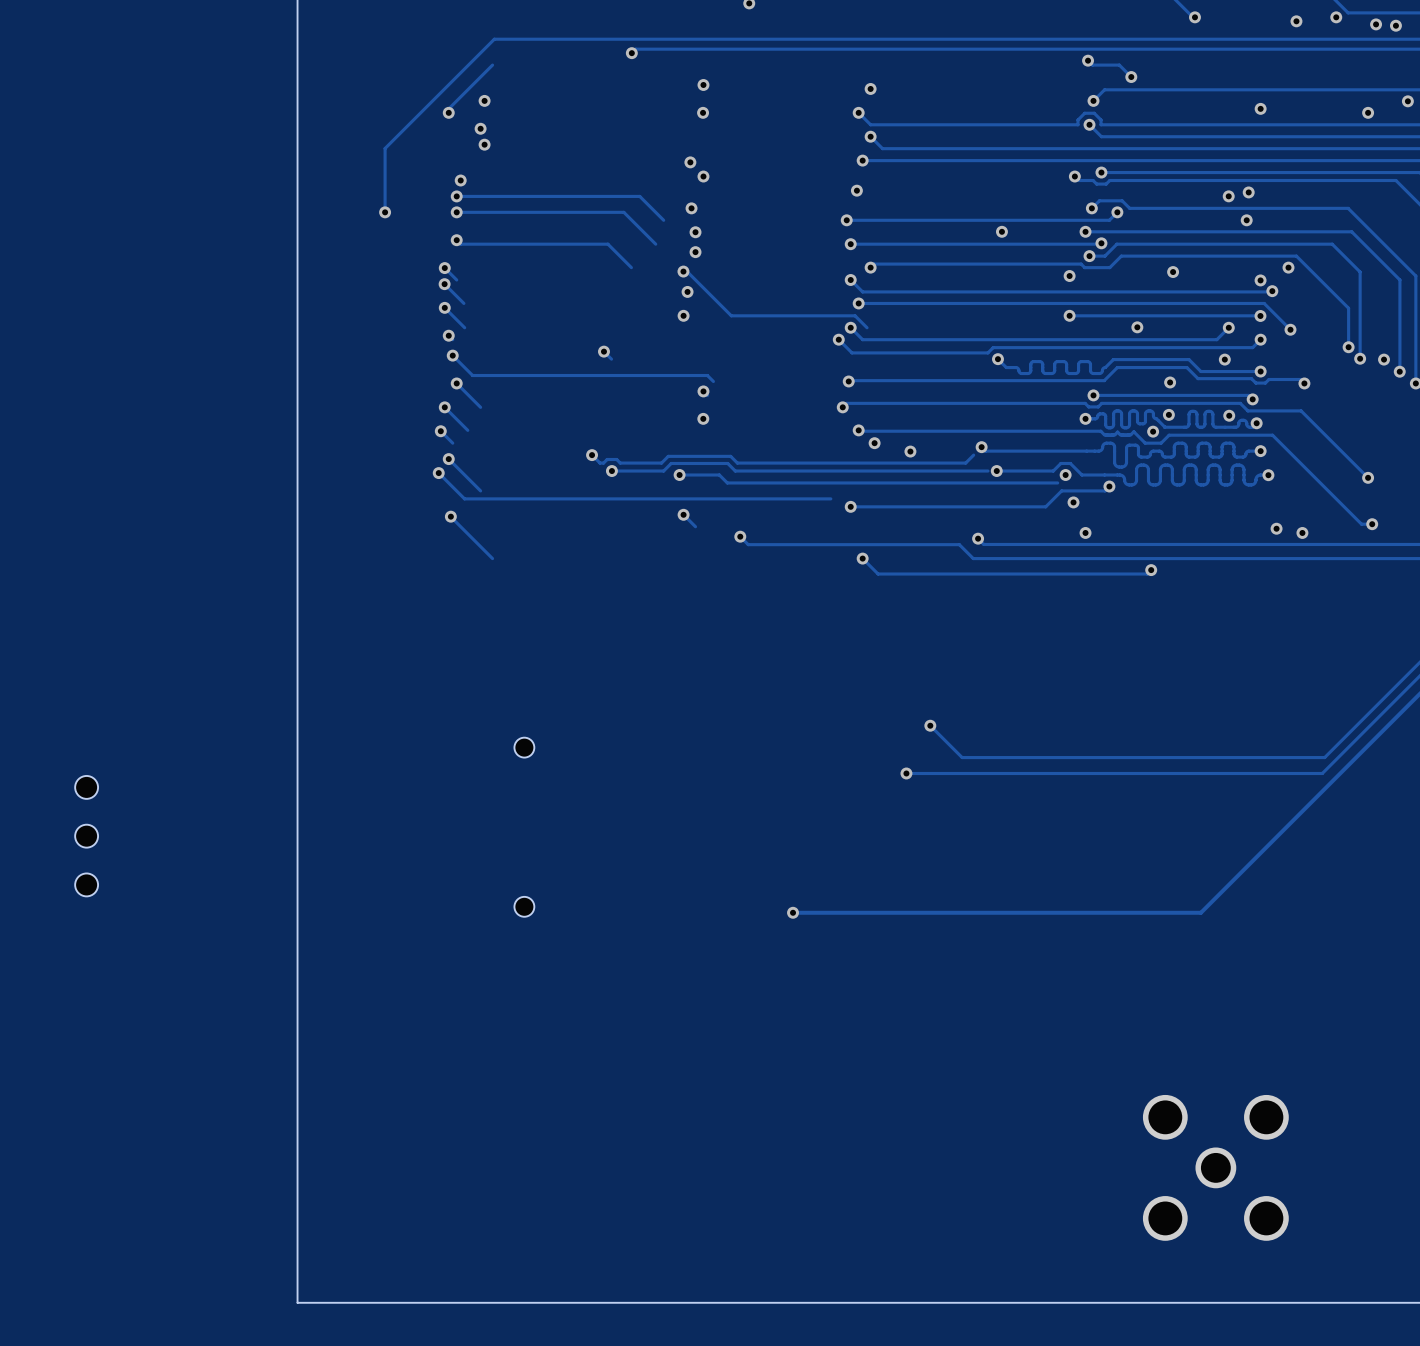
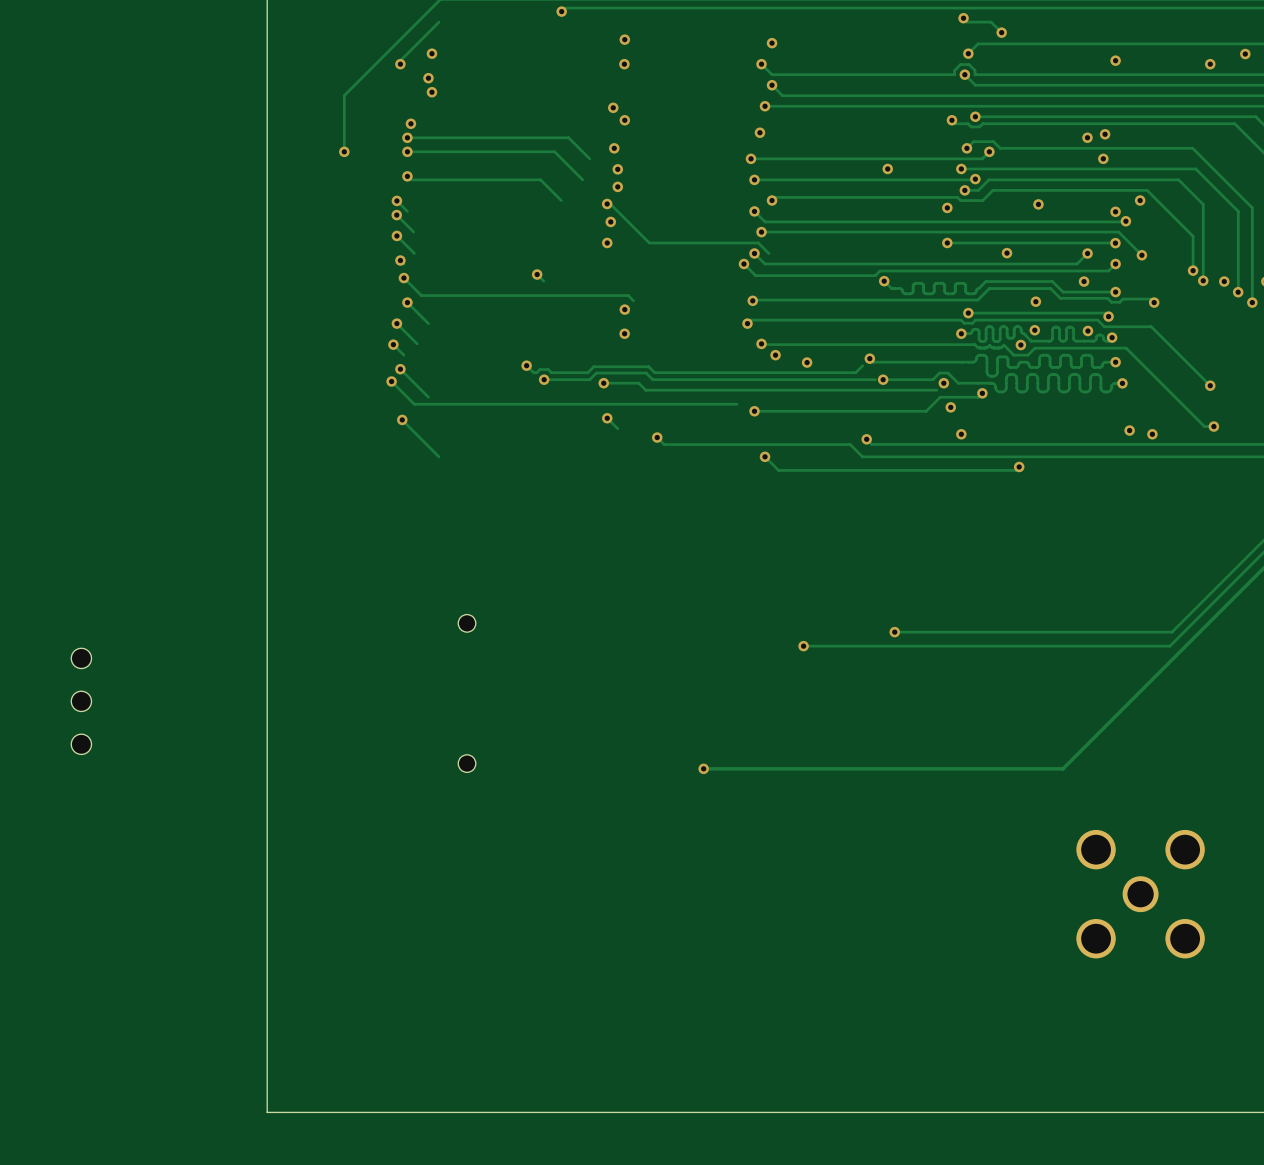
track: (930, 725) (962, 757) (1009, 757) -> none
via position: (930, 725) -> (894, 632)
part position: (1215, 1167) -> (1140, 894)

